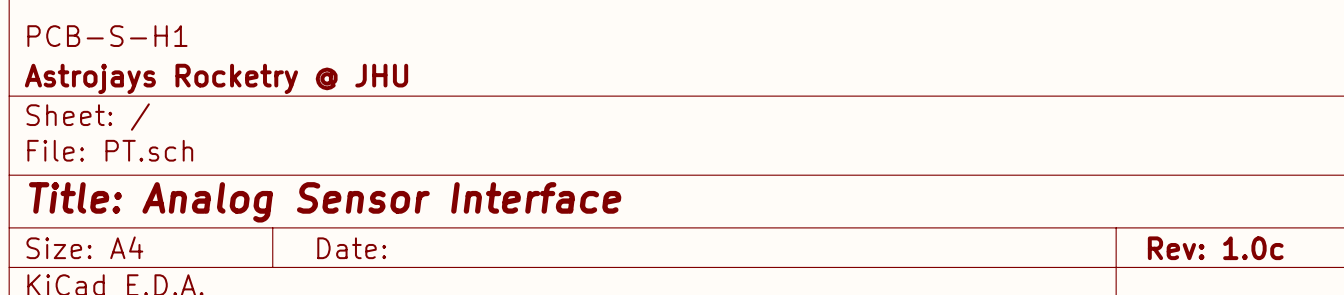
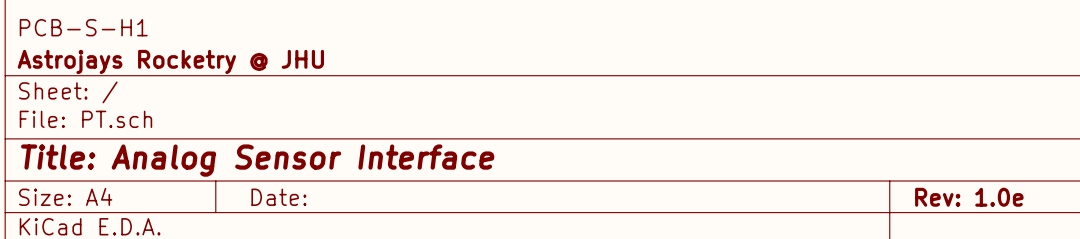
title block: Rev: 1.0c (1215, 248) -> Rev: 1.0e (969, 197)

